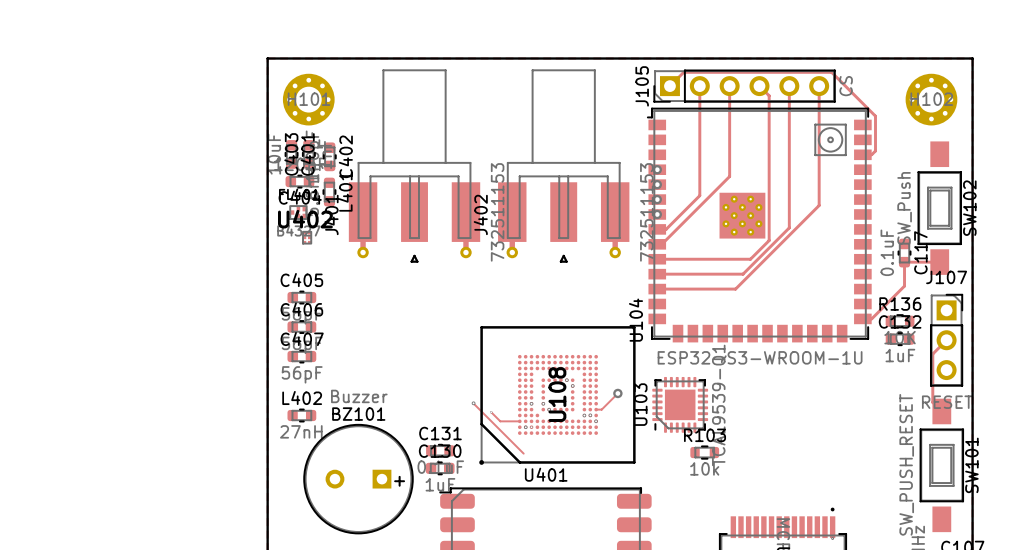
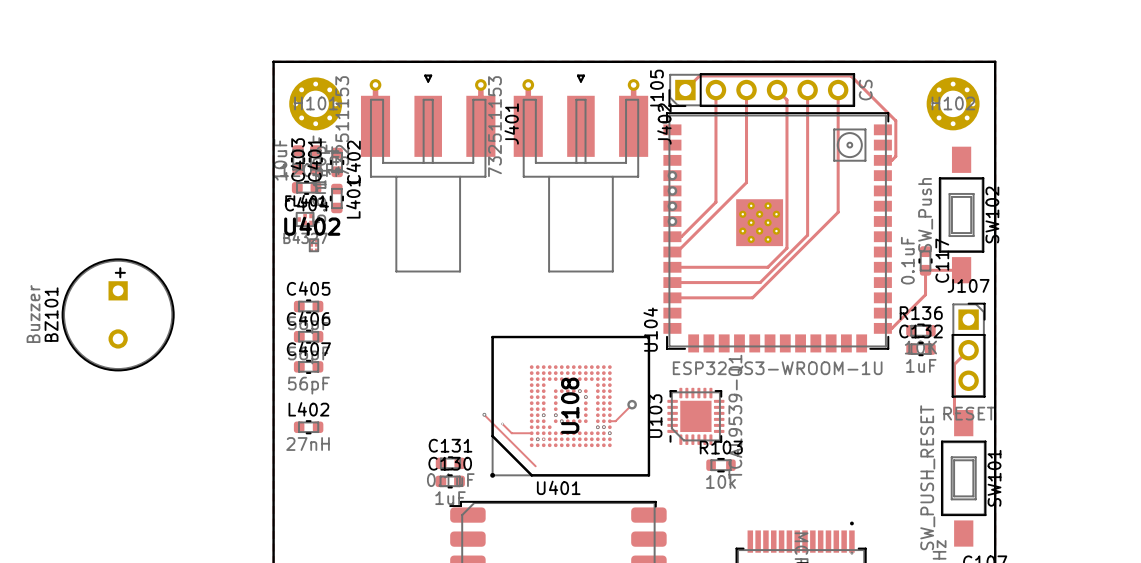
J401 rotation: 0° (414, 166) -> 180° (428, 173)
J402 rotation: 0° (563, 166) -> 180° (580, 173)
BZ101 rotation: 0° (358, 479) -> 90° counterclockwise (118, 314)
BZ101 position: (358, 479) -> (118, 314)

